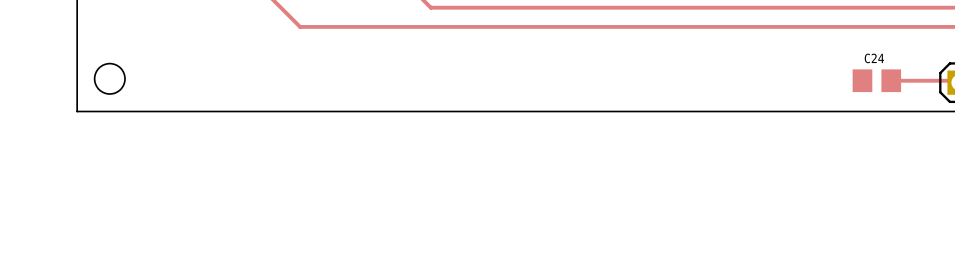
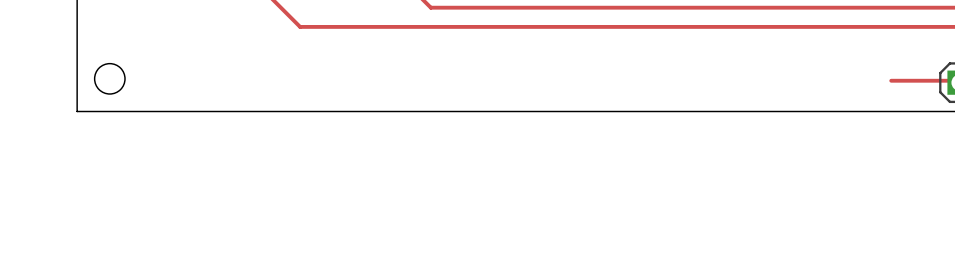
C24: (876, 80) -> none

